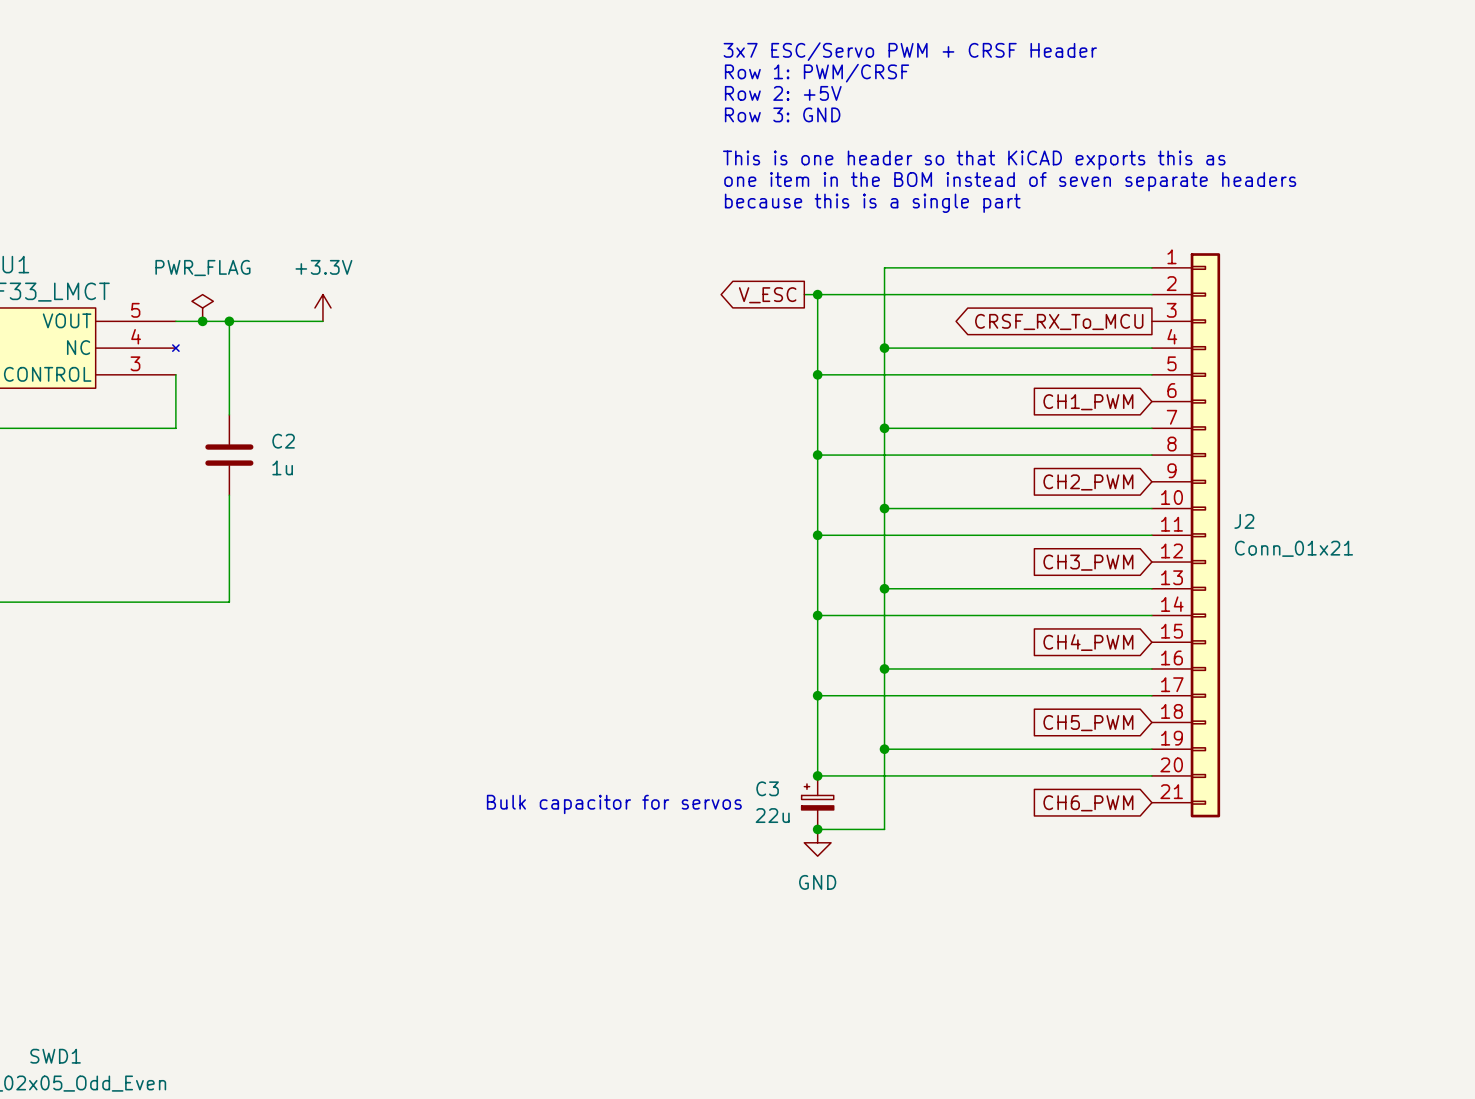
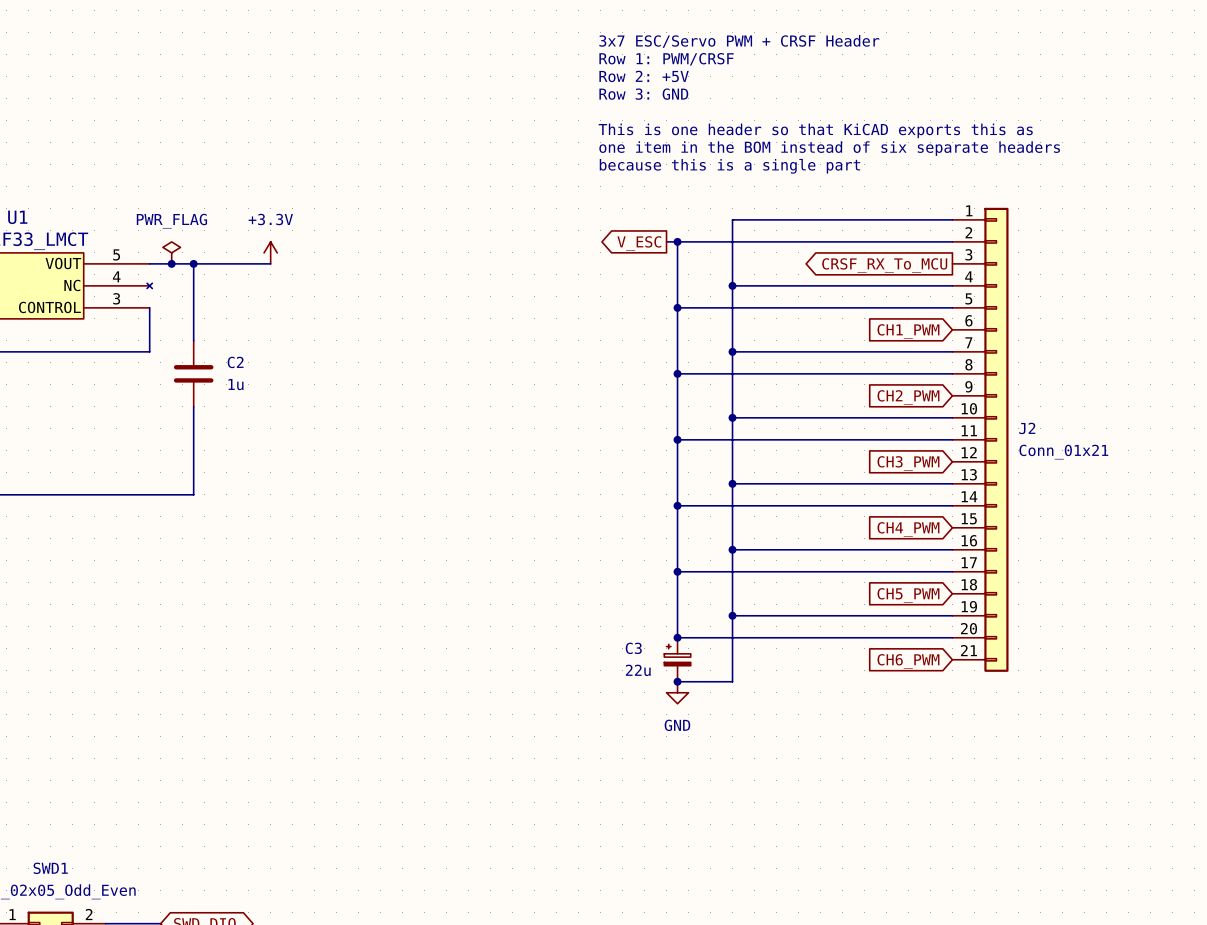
text: one item in the BOM instead of seven separate headers (1010, 181) -> one item in the BOM instead of six separate headers (829, 148)
text: Bulk capacitor for servos (614, 804) -> none

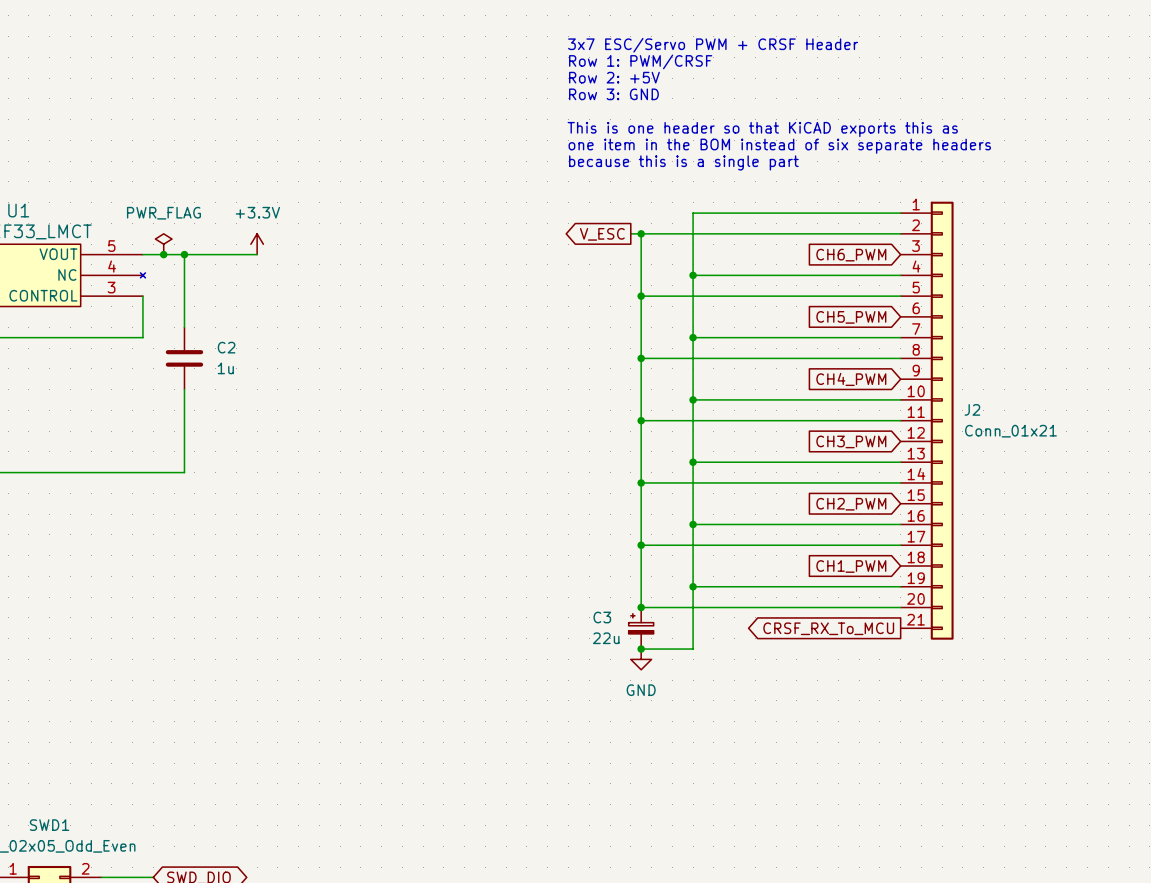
global label shape: output (884, 265) -> input (851, 255)
global label: CRSF_RX_To_MCU (884, 265) -> CH6_PWM (851, 255)
global label: CH1_PWM (908, 331) -> CH5_PWM (851, 317)
global label: CH2_PWM (908, 397) -> CH4_PWM (851, 379)
global label: CH4_PWM (908, 529) -> CH2_PWM (851, 504)
global label: CH5_PWM (908, 595) -> CH1_PWM (851, 566)
global label shape: input (908, 661) -> output (828, 628)
global label: CH6_PWM (908, 661) -> CRSF_RX_To_MCU (828, 628)

